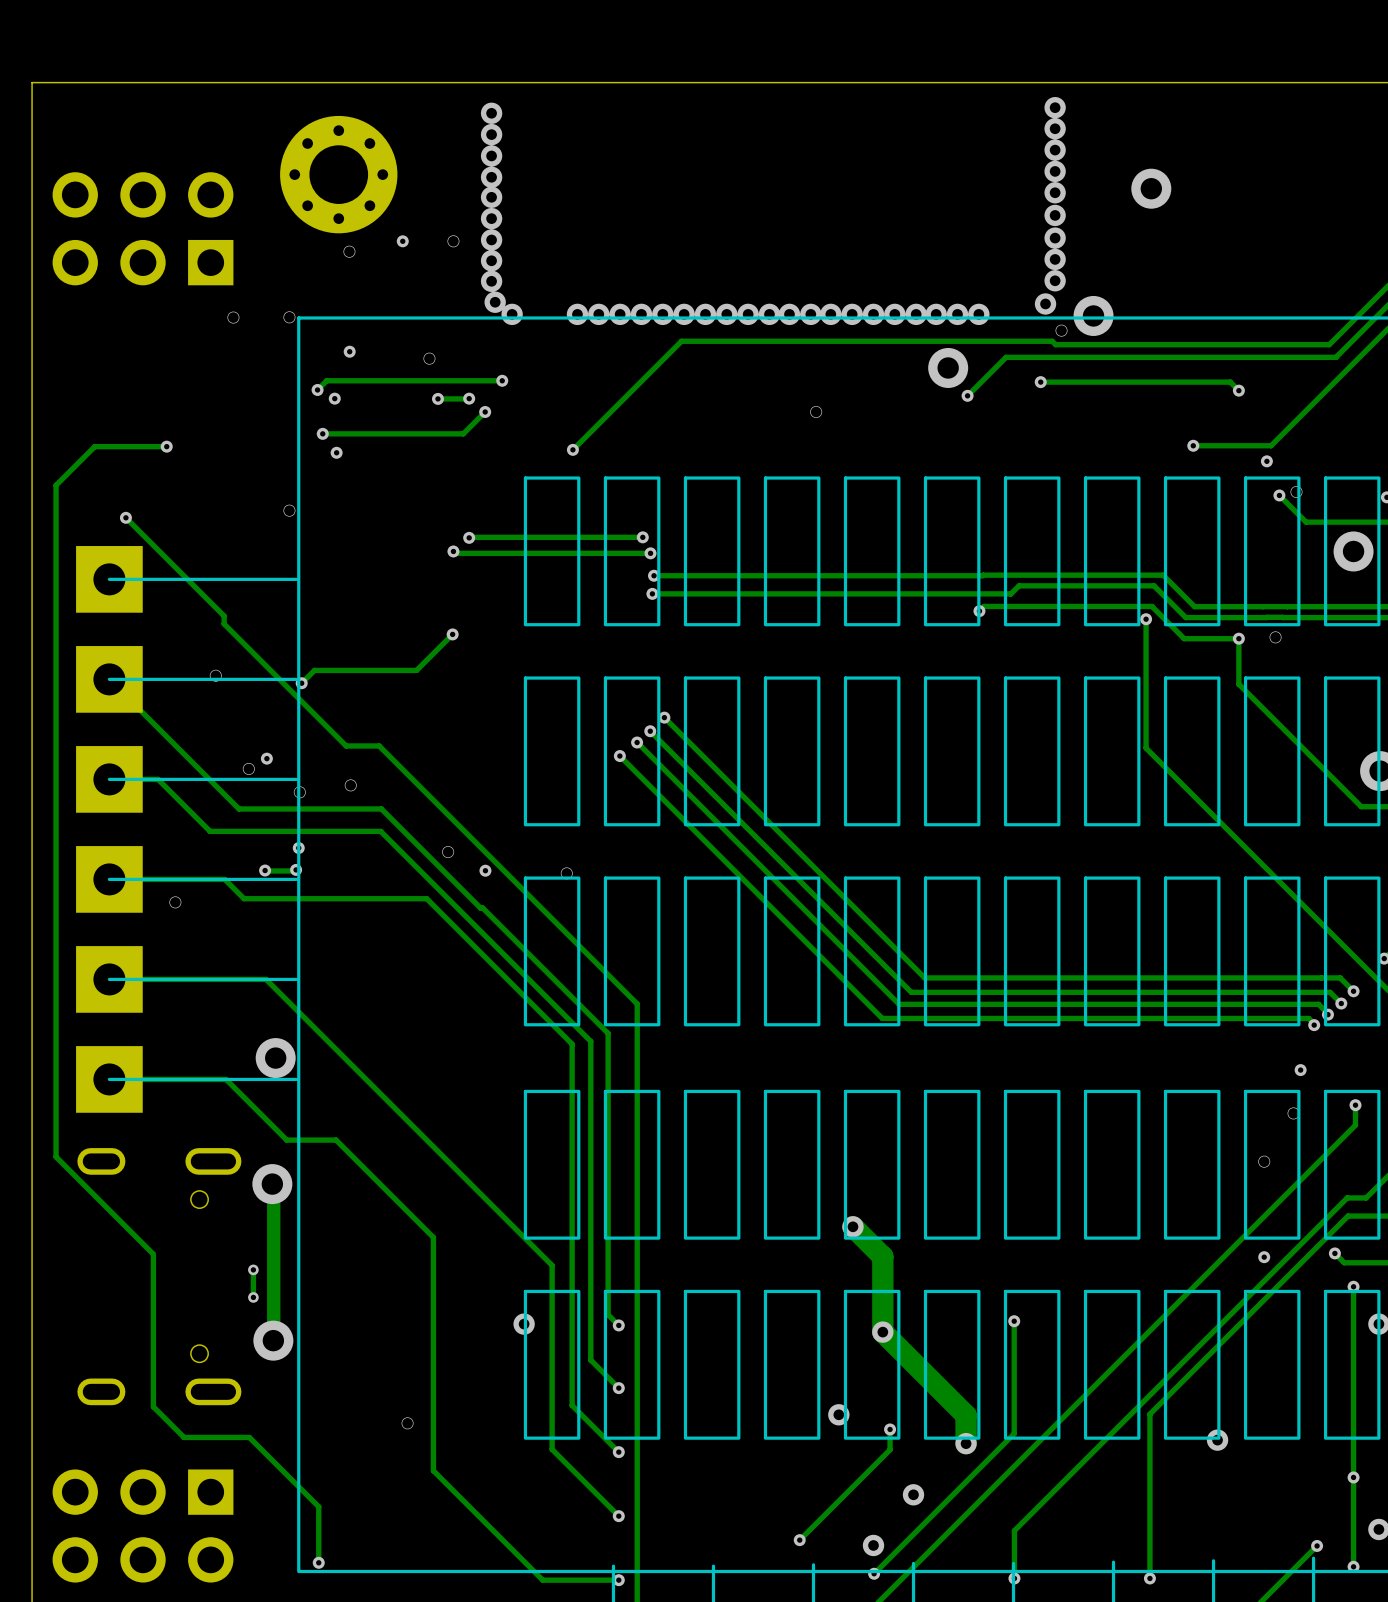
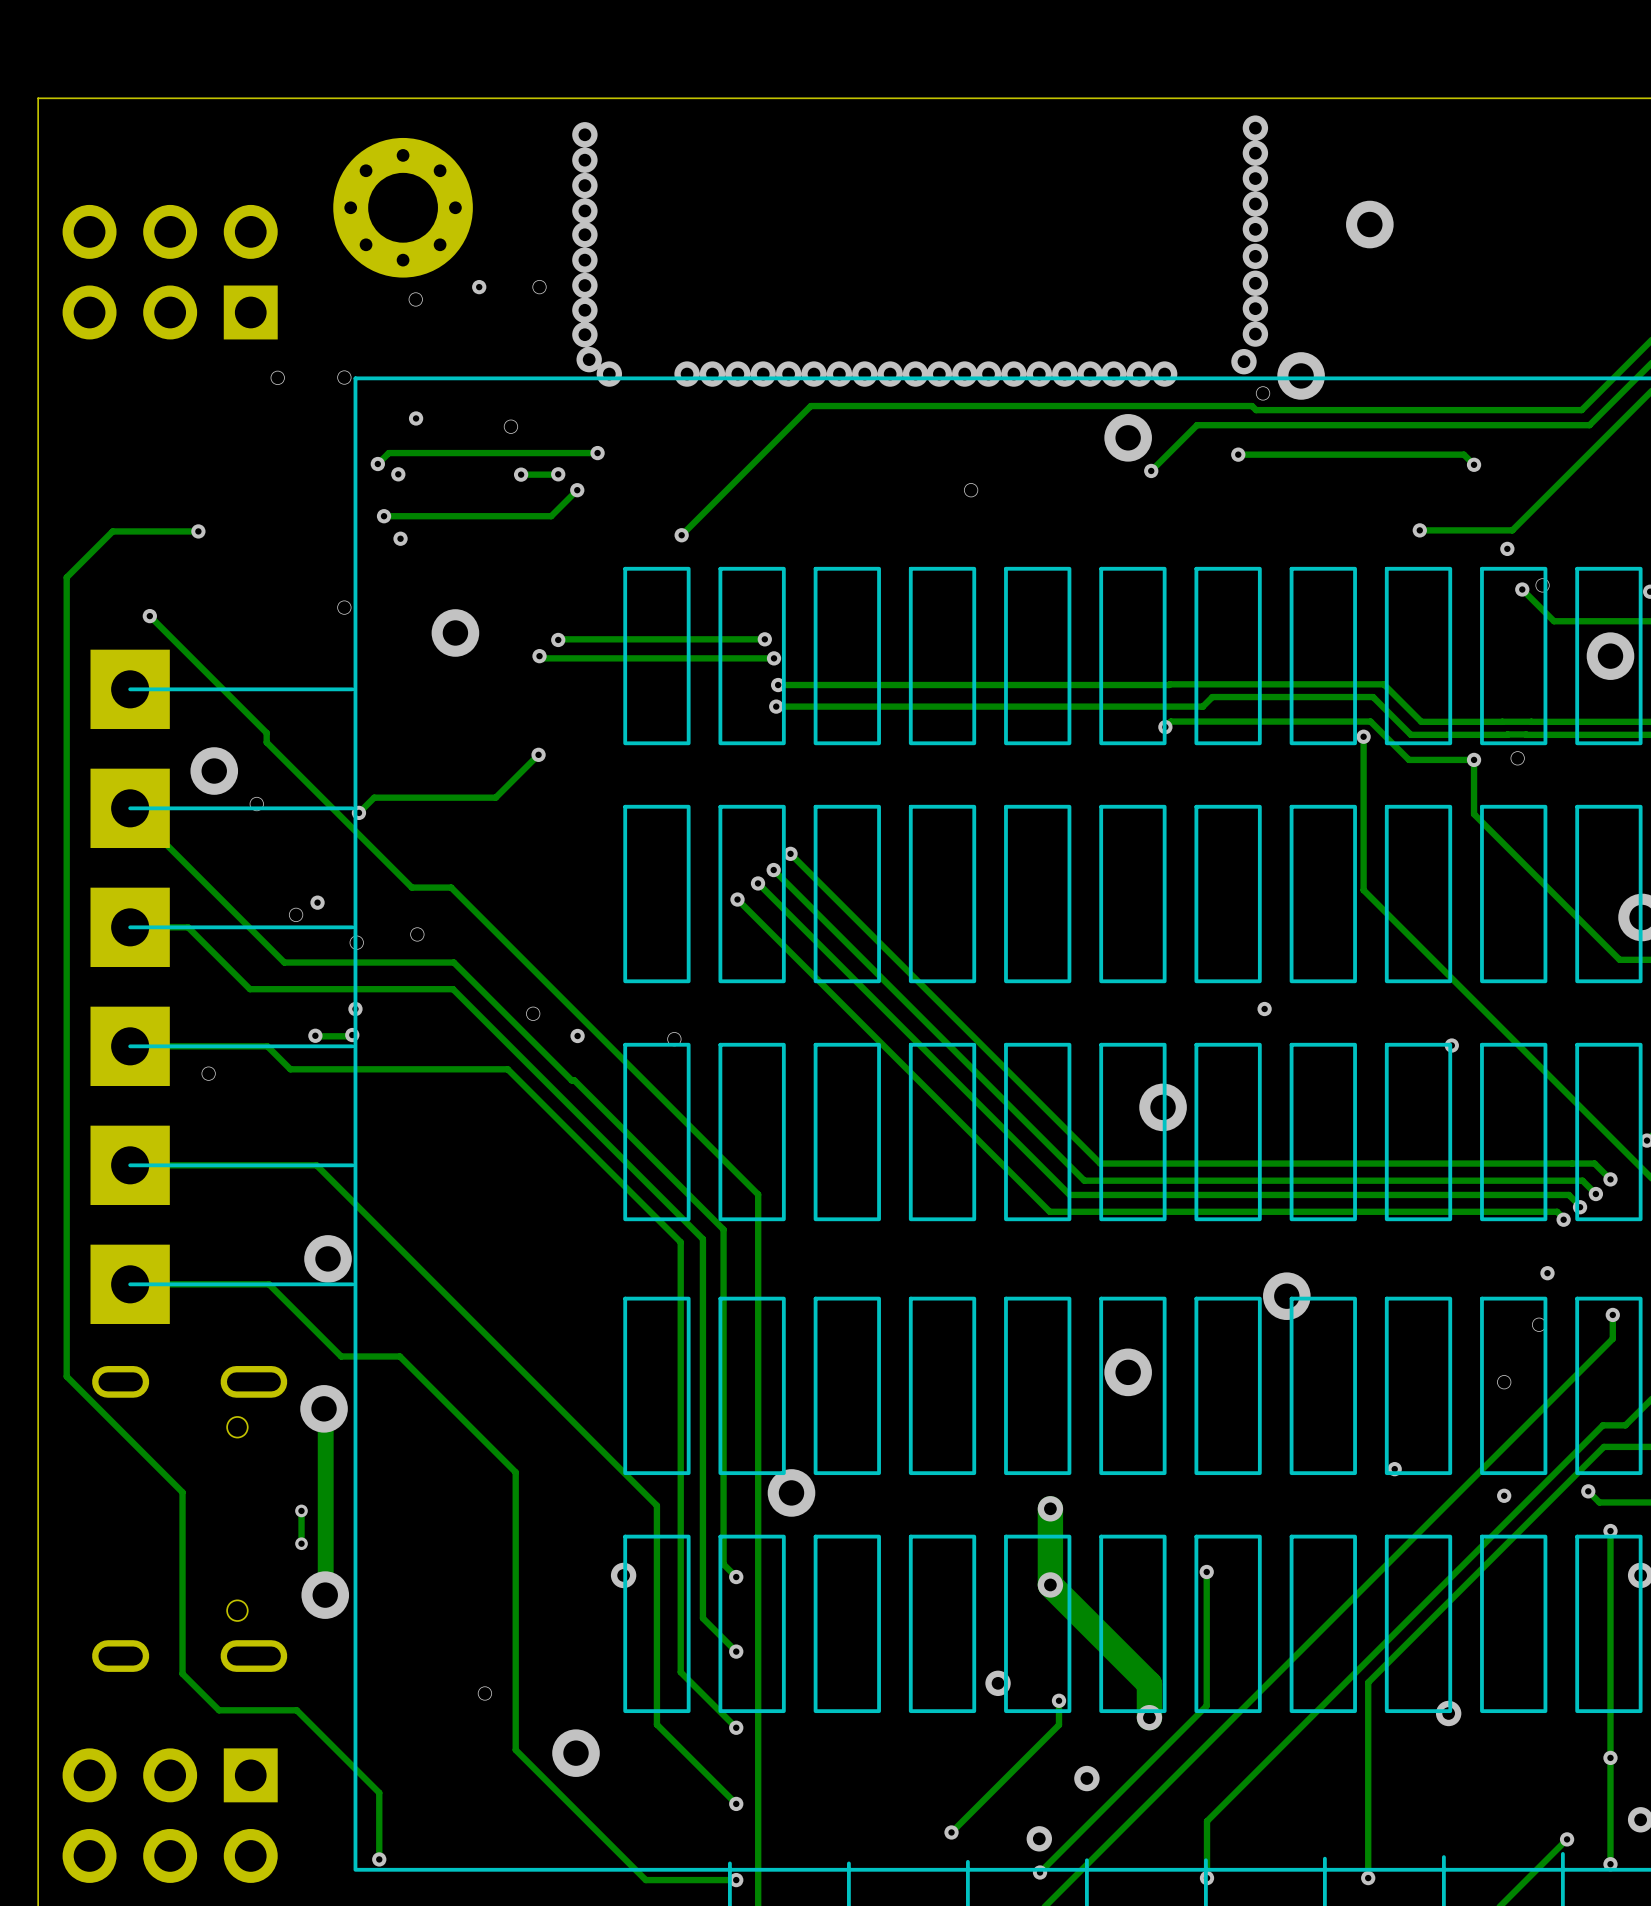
via: none -> (455, 632)
via: none -> (214, 771)
via: none -> (1264, 1009)
via: none -> (1451, 1045)
via: none -> (1163, 1107)
via: none -> (1286, 1296)
via: none -> (1128, 1372)
track: (852, 1226) (882, 1256) (882, 1268) -> none
via position: (852, 1226) -> (1050, 1508)
via: none -> (1394, 1469)
via: none -> (791, 1492)
via: none -> (576, 1753)

